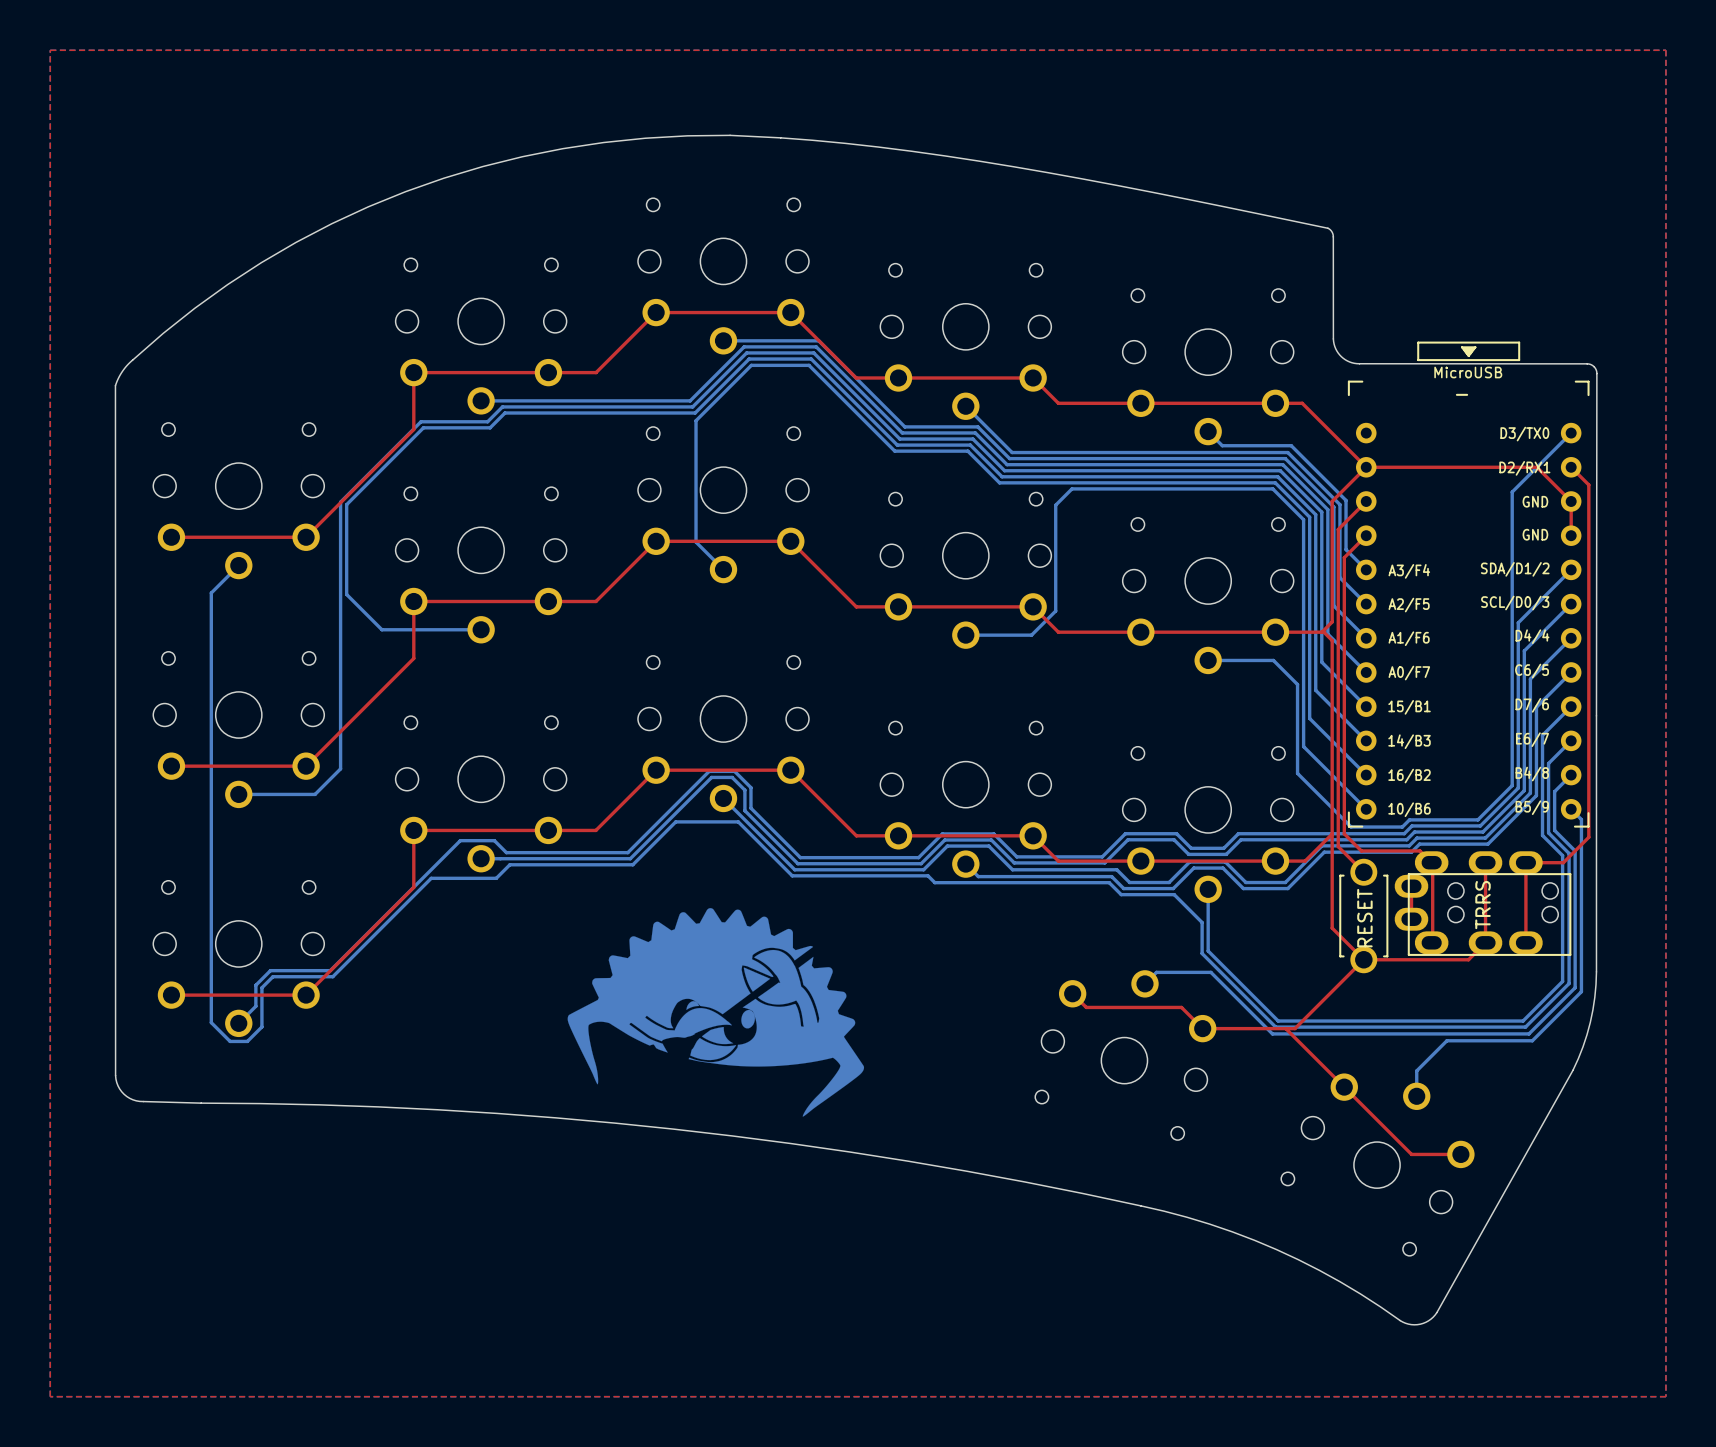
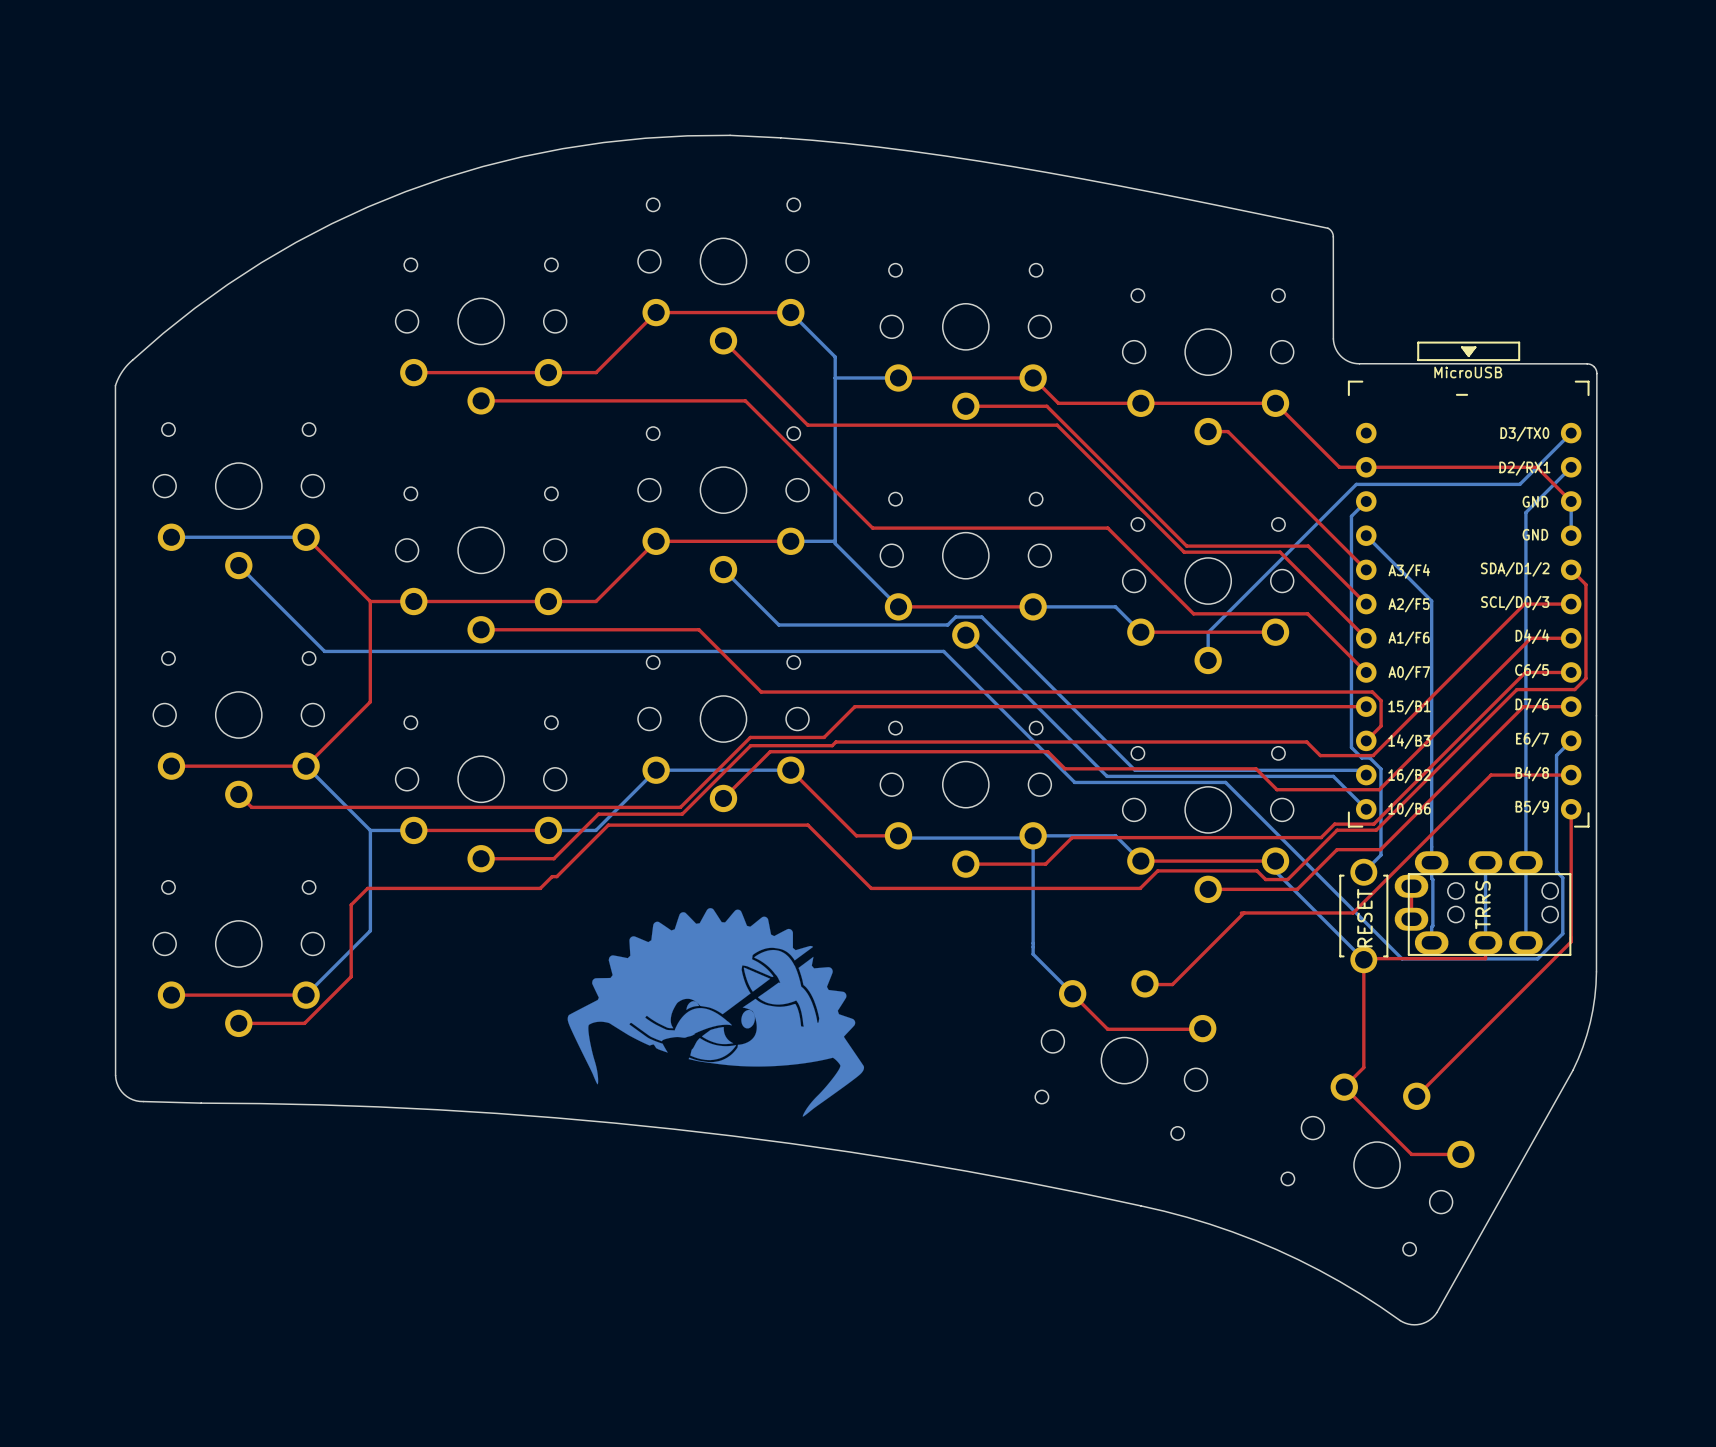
top zone outline: (50, 50) (50, 1396) (1665, 1396) (1665, 50) (50, 50) -> none
bottom track: none -> (790, 312) (835, 356) (835, 543) (898, 606)
top track: (790, 312) (856, 377) (898, 377) -> none
bottom track: (723, 340) (818, 340) (904, 426) (977, 426) (1009, 458) (1285, 458) (1333, 507) (1333, 605) (1366, 638) -> none
top track: none -> (723, 340) (807, 425) (1057, 425) (1184, 552) (1280, 552) (1366, 638)
top track: (413, 372) (413, 429) (306, 537) (171, 537) -> none
bottom track: none -> (835, 377) (898, 377)
bottom track: (481, 400) (690, 400) (744, 346) (816, 346) (902, 432) (975, 432) (1007, 464) (1282, 464) (1327, 509) (1327, 634) (1366, 672) -> none
top track: none -> (481, 400) (745, 400) (872, 528) (1107, 528) (1193, 613) (1307, 613) (1366, 672)
top track: (1275, 403) (1302, 403) (1366, 467) (1332, 501) (1332, 621) (1321, 632) -> (1275, 403) (1339, 467) (1366, 467)
bottom track: (965, 406) (1012, 452) (1287, 452) (1339, 504) (1339, 577) (1366, 604) -> none
top track: none -> (965, 406) (1046, 406) (1186, 546) (1308, 546) (1366, 604)
bottom track: (1208, 431) (1222, 445) (1291, 445) (1346, 500) (1346, 549) (1366, 569) -> none
top track: none -> (1208, 431) (1227, 431) (1366, 569)
bottom track: none -> (1571, 467) (1525, 512) (1525, 942)
top track: (1571, 467) (1588, 484) (1588, 837) (1563, 862) (1525, 862) (1525, 942) -> none
bottom track: (1519, 484) (1512, 492) (1512, 785) (1477, 819) (1409, 819) (1402, 827) (1351, 827) (1297, 773) (1297, 684) (1273, 660) (1208, 660) -> (1519, 484) (1356, 484) (1208, 632) (1208, 660)
bottom track: none -> (1366, 501) (1351, 516) (1351, 747) (1361, 757) (1369, 757) (1380, 769) (1380, 855) (1363, 872)
top track: (1366, 501) (1338, 529) (1338, 846) (1363, 872) -> none
bottom track: none -> (1571, 501) (1571, 535)
top track: (1571, 501) (1571, 535) -> none
bottom track: none -> (1366, 535) (1431, 601) (1431, 942)
top track: (1366, 535) (1344, 557) (1344, 833) (1361, 850) (1419, 850) (1432, 863) (1431, 942) -> none
bottom track: none -> (171, 537) (306, 537)
top track: none -> (306, 537) (370, 601)
bottom track: none -> (790, 541) (835, 541)
top track: (790, 541) (856, 606) (898, 606) -> none
bottom track: (238, 565) (211, 593) (211, 1022) (230, 1041) (247, 1041) (261, 1026) (261, 987) (272, 976) (332, 976) (431, 878) (496, 878) (509, 864) (632, 864) (675, 821) (738, 821) (792, 875) (928, 875) (934, 882) (1109, 882) (1121, 894) (1174, 894) (1202, 922) (1202, 953) (1275, 1027) (1525, 1027) (1569, 983) (1569, 853) (1548, 832) (1548, 763) (1556, 755) -> (238, 565) (324, 651) (943, 651) (1074, 782) (1225, 782) (1402, 958) (1537, 958) (1562, 933) (1562, 877) (1556, 871) (1556, 755)
bottom track: (723, 569) (696, 542) (696, 420) (751, 365) (809, 365) (894, 451) (967, 451) (999, 482) (1275, 482) (1309, 517) (1309, 718) (1361, 770) -> (723, 569) (778, 624) (947, 624) (955, 617) (981, 617) (1135, 770) (1361, 770)
bottom track: (1571, 569) (1518, 622) (1518, 788) (1480, 825) (1412, 825) (1404, 833) (1238, 833) (1223, 848) (1191, 848) (1176, 833) (1125, 833) (1102, 856) (1016, 856) (993, 833) (942, 833) (918, 857) (800, 857) (750, 808) (750, 787) (734, 771) (709, 771) (627, 852) (506, 852) (494, 840) (460, 840) (330, 970) (270, 970) (255, 985) (255, 1006) (238, 1023) -> none
top track: none -> (1571, 569) (1585, 584) (1585, 678) (1574, 689) (1516, 689) (1376, 830) (1337, 830) (1287, 879) (1265, 879) (1257, 870) (1157, 870) (1140, 888) (871, 888) (807, 825) (608, 825) (556, 876) (552, 876) (540, 888) (367, 888) (351, 904) (351, 976) (304, 1023) (238, 1023)
top track: none -> (370, 601) (413, 601)
top track: (413, 601) (413, 658) (370, 701) -> (370, 601) (370, 701)
bottom track: (1571, 604) (1524, 650) (1524, 790) (1482, 832) (1414, 832) (1406, 839) (1240, 839) (1226, 854) (1188, 854) (1174, 839) (1127, 839) (1104, 862) (1014, 862) (991, 839) (944, 839) (921, 863) (797, 863) (744, 810) (744, 790) (732, 777) (711, 777) (630, 858) (481, 858) -> none
top track: none -> (1571, 604) (1524, 604) (1373, 755) (1320, 755) (1306, 742) (835, 742) (832, 745) (750, 745) (682, 814) (598, 814) (553, 858) (481, 858)
bottom track: none -> (1033, 606) (1115, 606) (1140, 632)
top track: (1033, 606) (1058, 632) (1140, 632) -> none
bottom track: (481, 629) (381, 629) (346, 594) (346, 504) (423, 427) (490, 427) (504, 413) (695, 413) (749, 359) (811, 359) (897, 445) (970, 445) (1002, 476) (1277, 476) (1315, 514) (1315, 690) (1366, 740) -> none
top track: none -> (481, 629) (699, 629) (761, 692) (1372, 692) (1381, 700) (1381, 726) (1366, 740)
top track: (1275, 632) (1323, 632) (1332, 640) (1332, 928) (1363, 959) -> none
bottom track: (965, 635) (1031, 635) (1055, 611) (1055, 505) (1071, 488) (1272, 488) (1303, 519) (1303, 746) (1333, 776) -> (965, 635) (1107, 776) (1333, 776)
bottom track: (1571, 638) (1530, 679) (1530, 793) (1485, 838) (1417, 838) (1409, 845) (1322, 845) (1285, 882) (1245, 882) (1225, 862) (1189, 862) (1169, 882) (1129, 882) (1116, 869) (1012, 869) (988, 846) (947, 846) (923, 869) (794, 869) (723, 798) -> none
top track: none -> (1571, 638) (1530, 638) (1379, 789) (1276, 789) (1256, 768) (1064, 768) (1047, 751) (770, 751) (723, 798)
bottom track: (1571, 672) (1536, 707) (1536, 795) (1487, 844) (1419, 844) (1411, 852) (1324, 852) (1287, 888) (1243, 888) (1222, 868) (1193, 868) (1173, 888) (1123, 888) (1111, 876) (978, 876) (965, 864) -> none
top track: none -> (1571, 672) (1525, 672) (1373, 824) (1334, 824) (1321, 837) (1072, 837) (1045, 864) (965, 864)
bottom track: (1366, 706) (1321, 662) (1321, 512) (1280, 470) (1004, 470) (972, 439) (899, 439) (813, 352) (746, 352) (692, 406) (502, 406) (487, 421) (420, 421) (340, 502) (340, 768) (315, 794) (238, 794) -> none
top track: none -> (1366, 706) (854, 706) (824, 737) (750, 737) (680, 807) (251, 807) (238, 794)
bottom track: (1571, 706) (1542, 735) (1542, 835) (1562, 855) (1562, 981) (1523, 1021) (1278, 1021) (1208, 951) (1208, 889) -> none
top track: none -> (1571, 706) (1523, 706) (1380, 849) (1337, 849) (1297, 889) (1208, 889)
bottom track: none -> (306, 766) (370, 830)
bottom track: none -> (790, 770) (656, 770) (595, 830) (548, 830)
top track: (790, 770) (656, 770) (595, 830) (548, 830) -> none
bottom track: (1571, 775) (1554, 791) (1554, 830) (1575, 850) (1575, 987) (1528, 1033) (1272, 1033) (1210, 972) (1156, 972) (1144, 983) -> none
top track: none -> (1571, 775) (1491, 775) (1353, 912) (1241, 912)
bottom track: (1571, 809) (1581, 819) (1581, 991) (1532, 1040) (1446, 1040) (1416, 1070) (1416, 1096) -> none
top track: none -> (1571, 809) (1571, 941) (1416, 1096)
bottom track: none -> (370, 830) (370, 930) (306, 995)
bottom track: none -> (370, 830) (413, 830)
top track: (413, 830) (413, 887) (306, 995) -> none
top track: (1332, 834) (1305, 861) (1275, 861) -> none
bottom track: none -> (898, 835) (900, 838) (1030, 838) (1033, 835)
top track: (898, 835) (1033, 835) (1058, 861) (1140, 861) -> none
bottom track: none -> (1033, 835) (1115, 835) (1140, 861)
bottom track: none -> (1033, 835) (1033, 954) (1072, 993)
bottom track: none -> (1275, 861) (1275, 871) (1363, 959)
bottom track: none -> (1485, 862) (1485, 942)
top track: (1485, 862) (1485, 942) (1468, 959) (1363, 959) -> none
top track: none -> (1244, 912) (1172, 984) (1145, 984)
top track: (1363, 959) (1294, 1028) (1202, 1028) (1181, 1007) (1086, 1007) (1072, 993) -> none
top track: none -> (1072, 994) (1107, 1029) (1202, 1029)
top track: (1285, 1028) (1344, 1087) -> (1485, 942) (1485, 958) (1363, 959) (1363, 1067) (1344, 1087)

